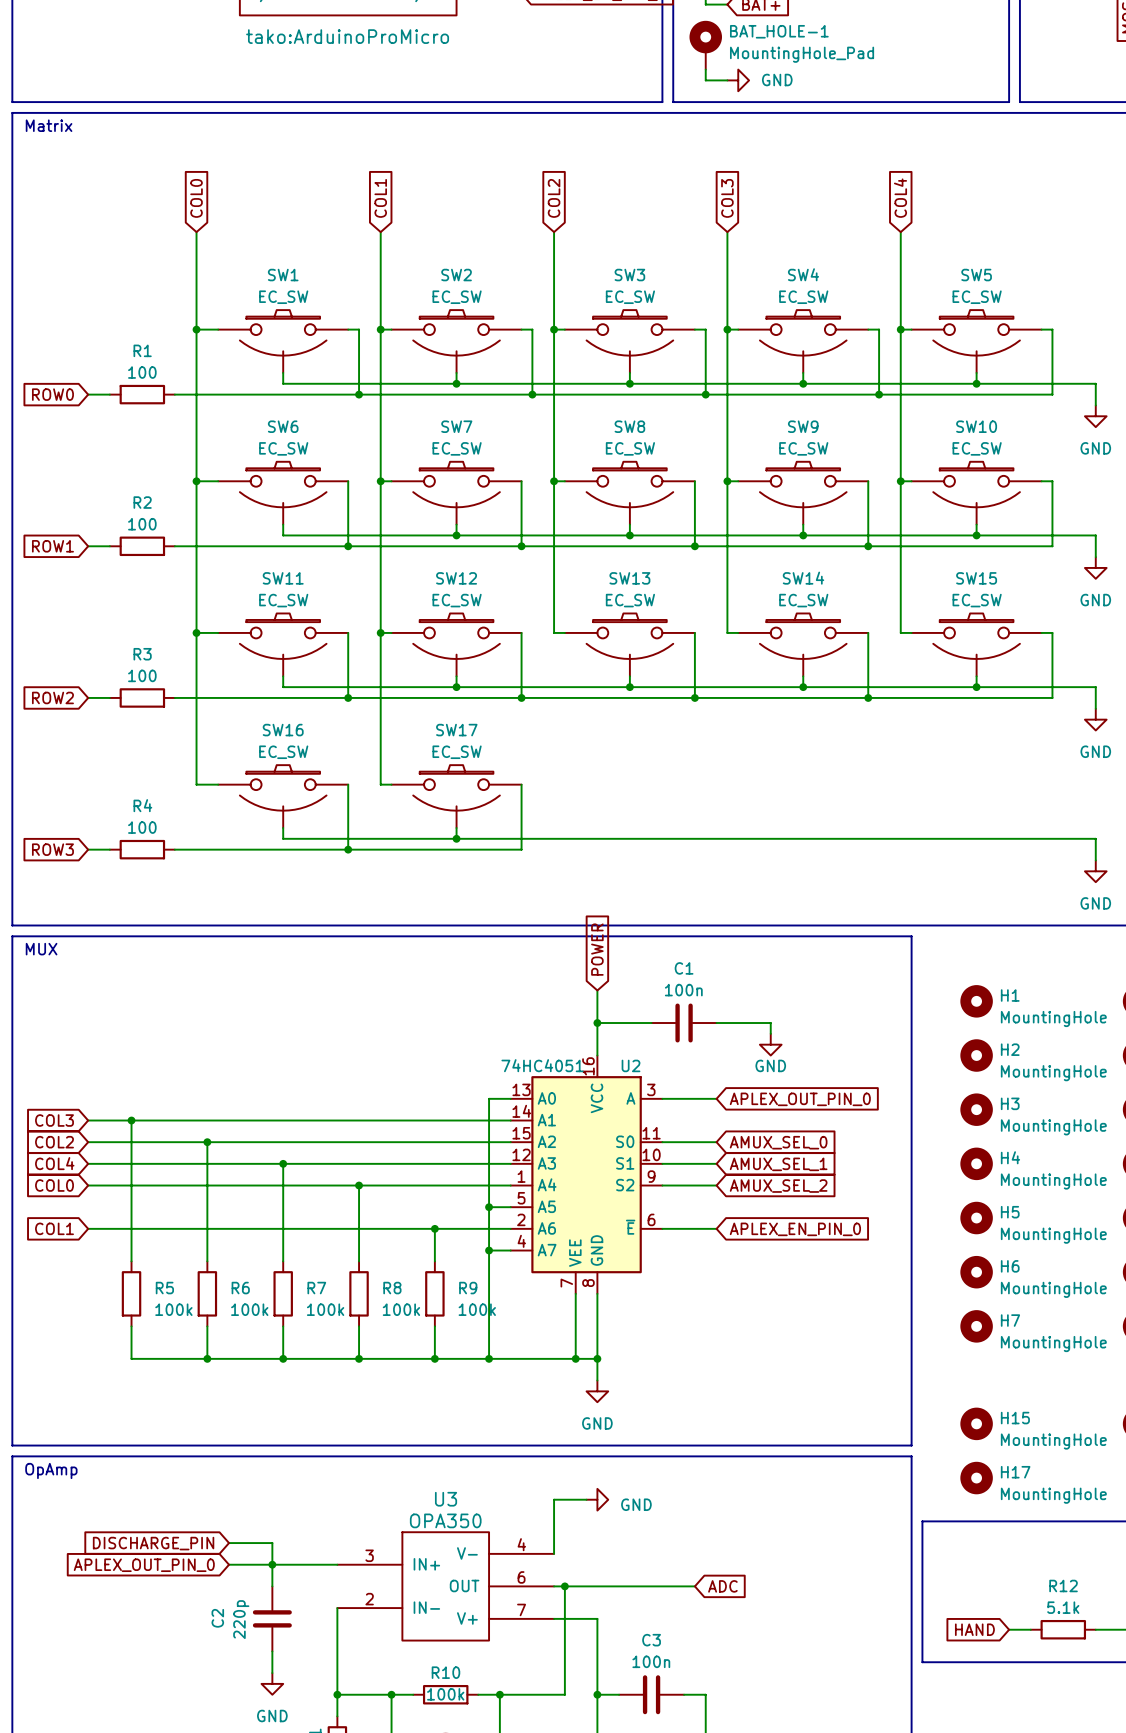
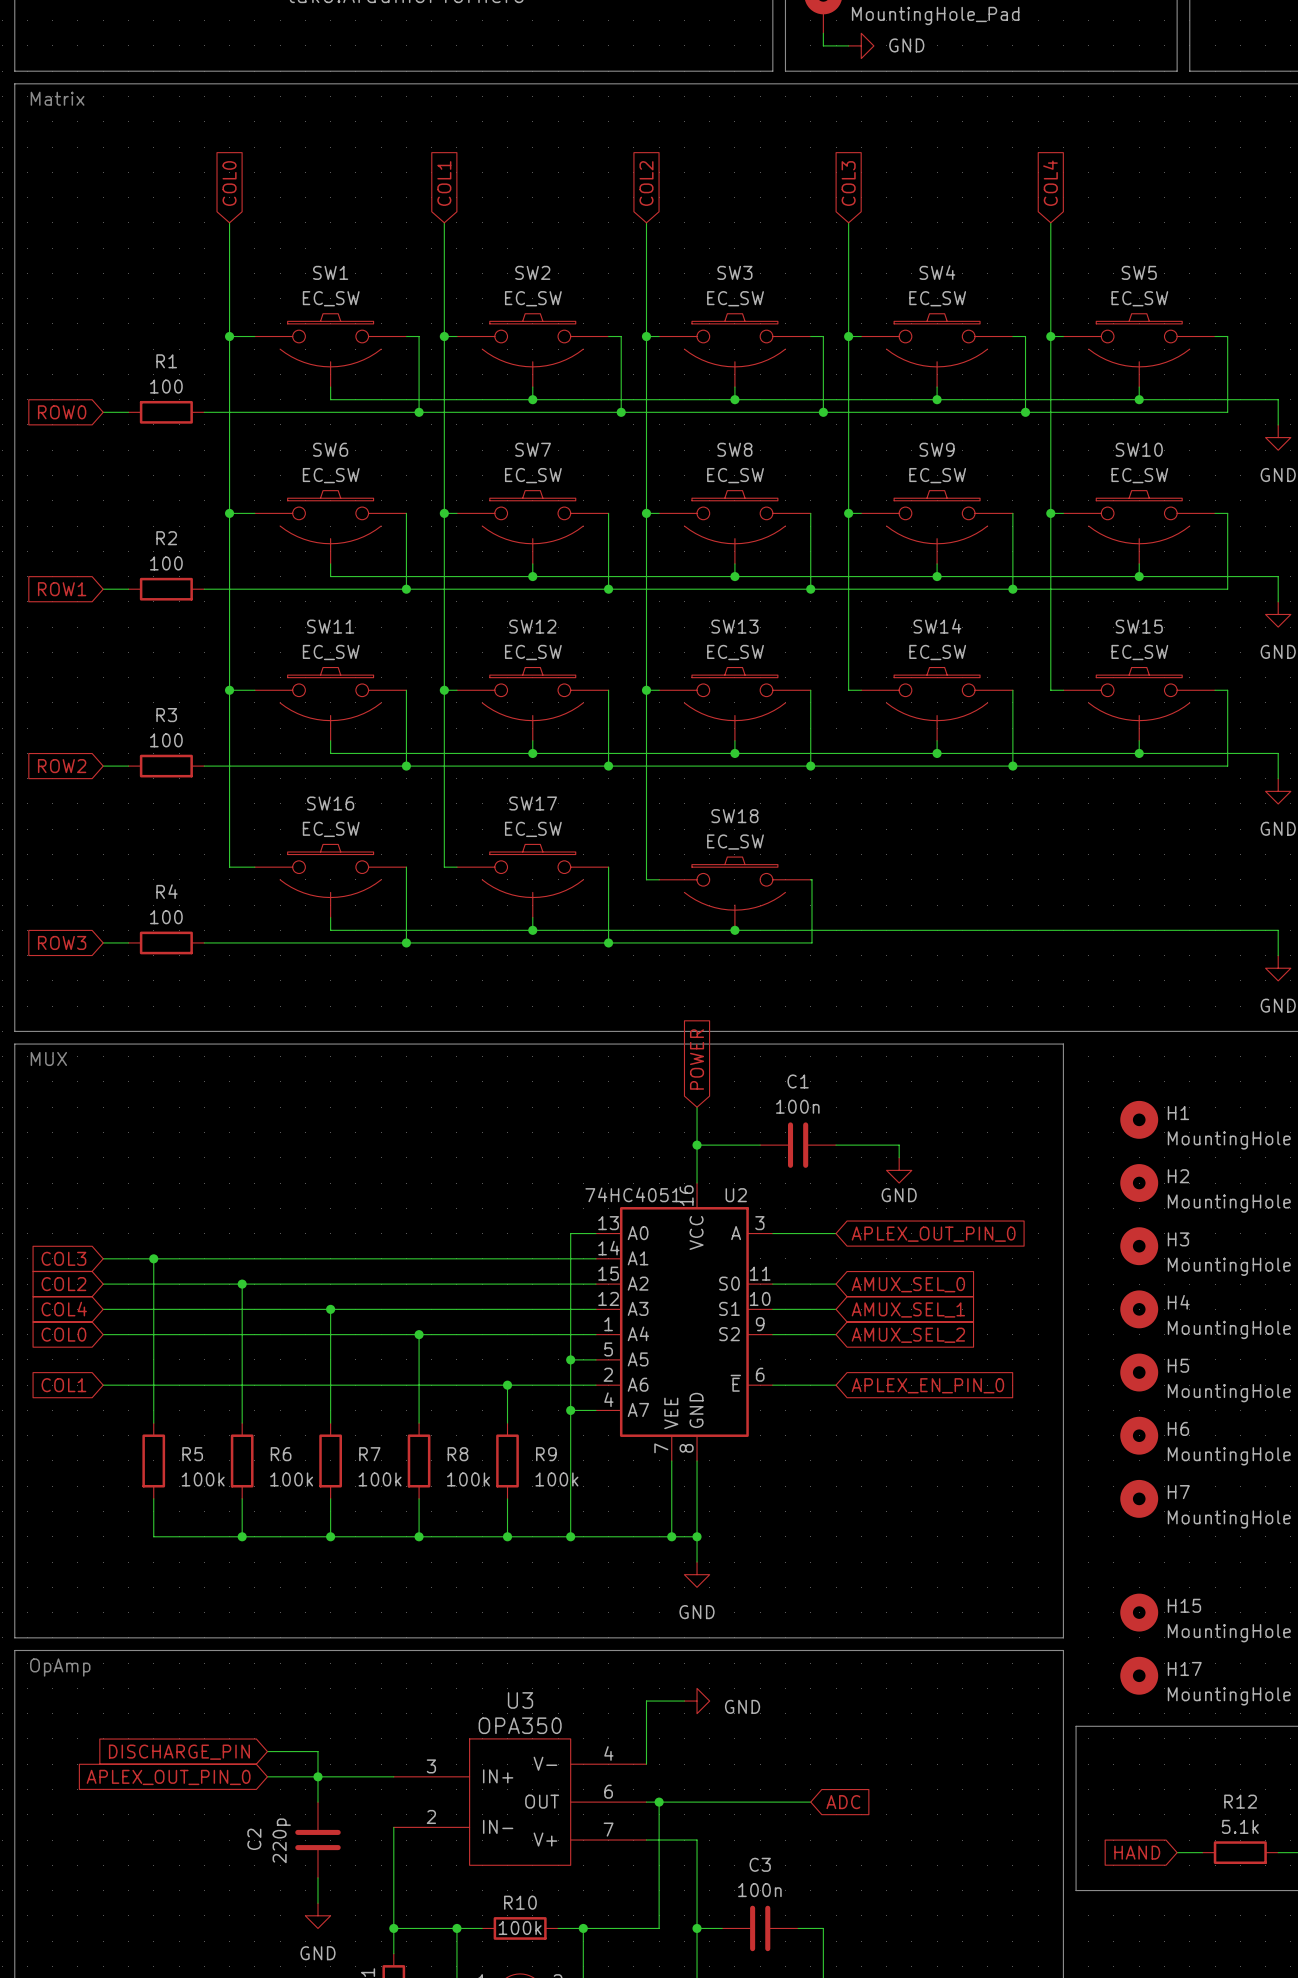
wire: none -> (646, 690) (646, 879) (659, 879)
junction: none -> (646, 690)
wire: none -> (810, 879) (811, 942) (608, 942)
SW18: none -> EC_SW (734, 893)
junction: none -> (734, 930)
junction: none -> (608, 942)

